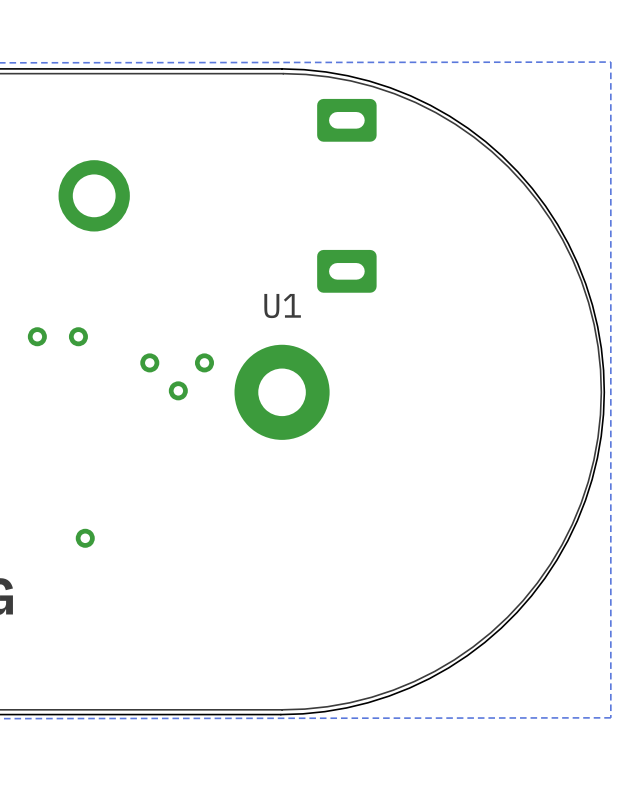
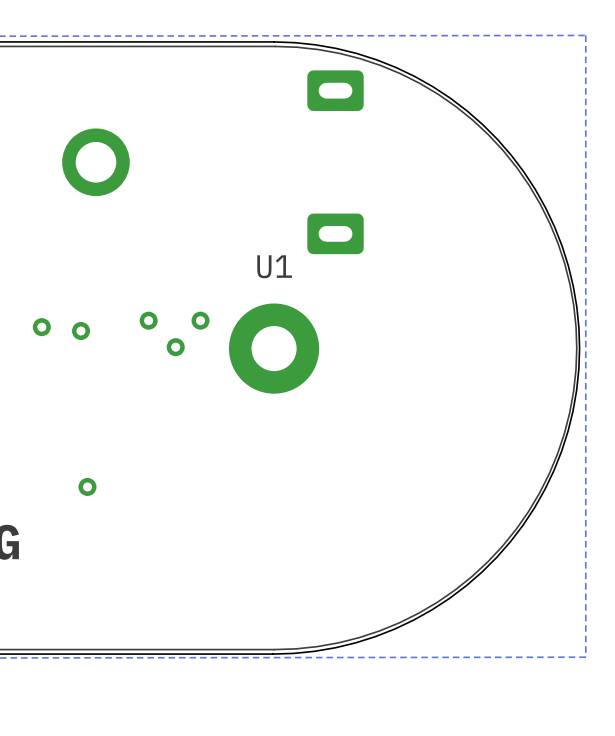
via: (37, 336) -> none
via: (78, 336) -> none
via: none -> (41, 327)
via: none -> (81, 330)

